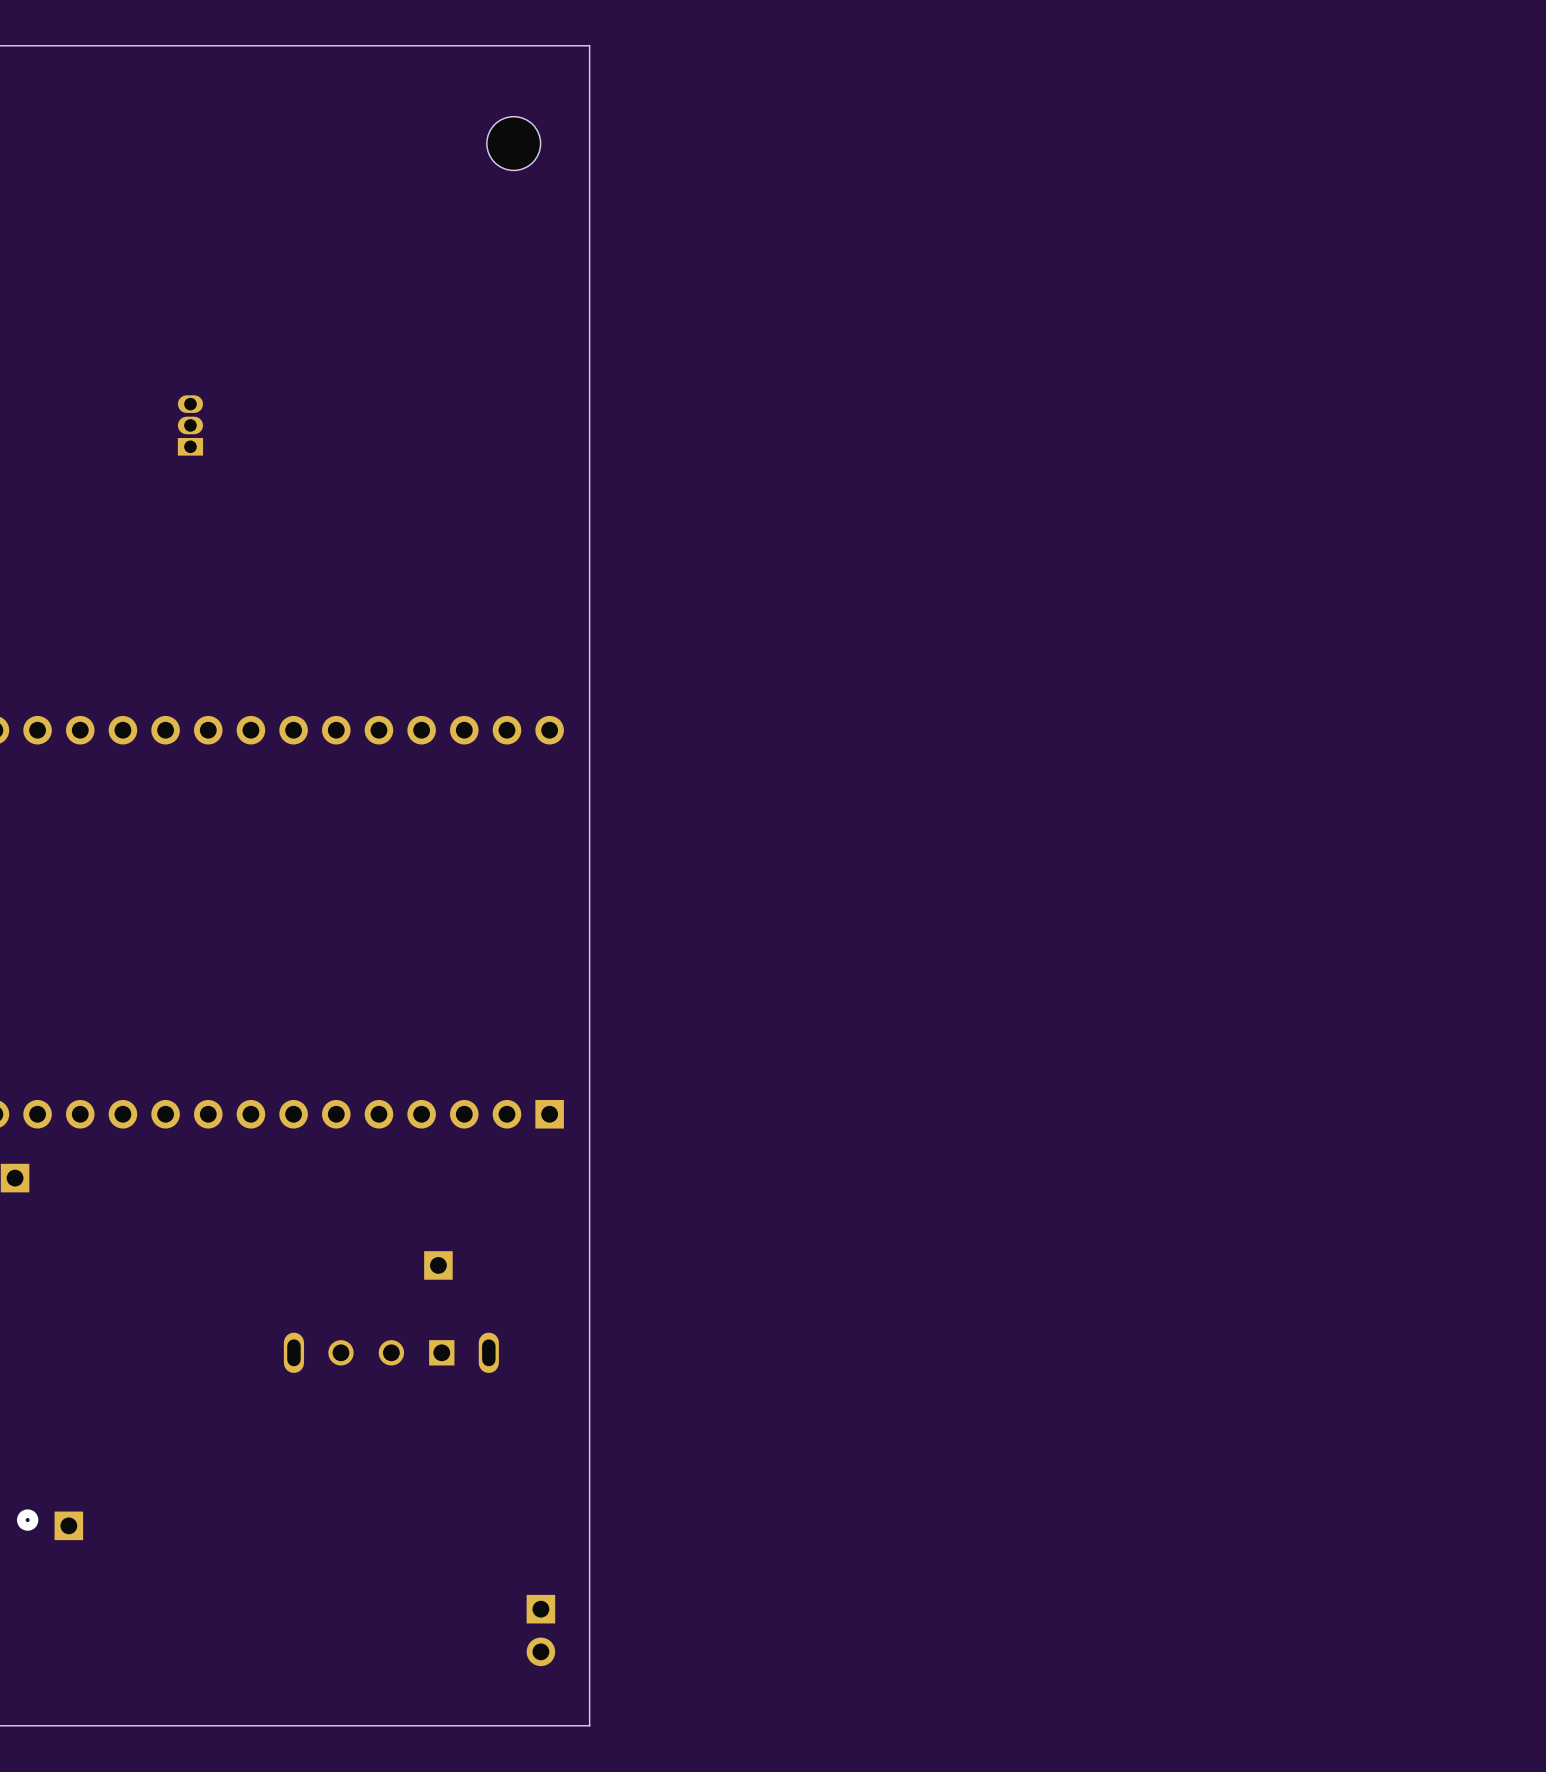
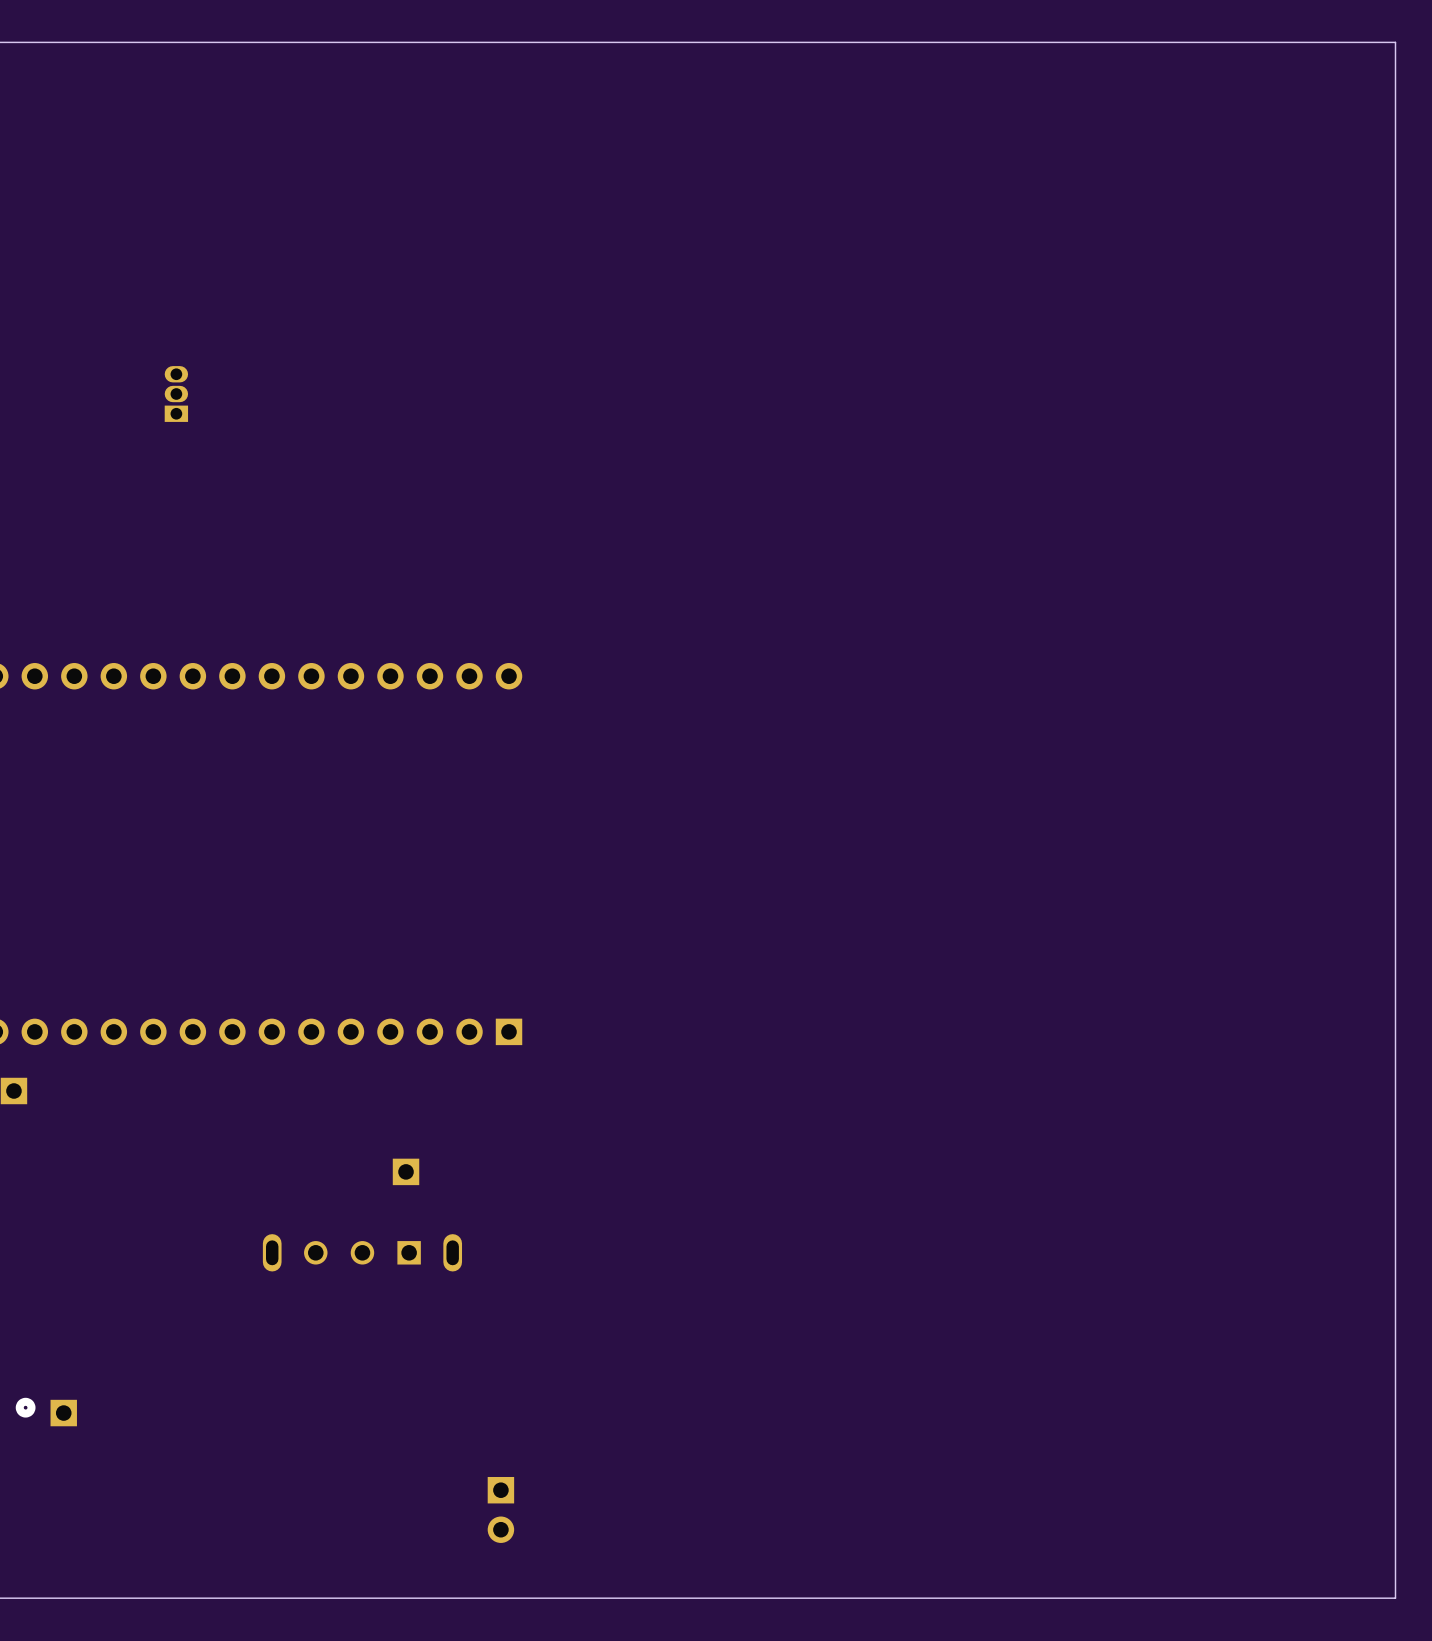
board edge: (589, 45) (589, 1725) -> (546, 42) (1395, 42) (1395, 1598) (546, 1598)
part: (513, 143) -> none

